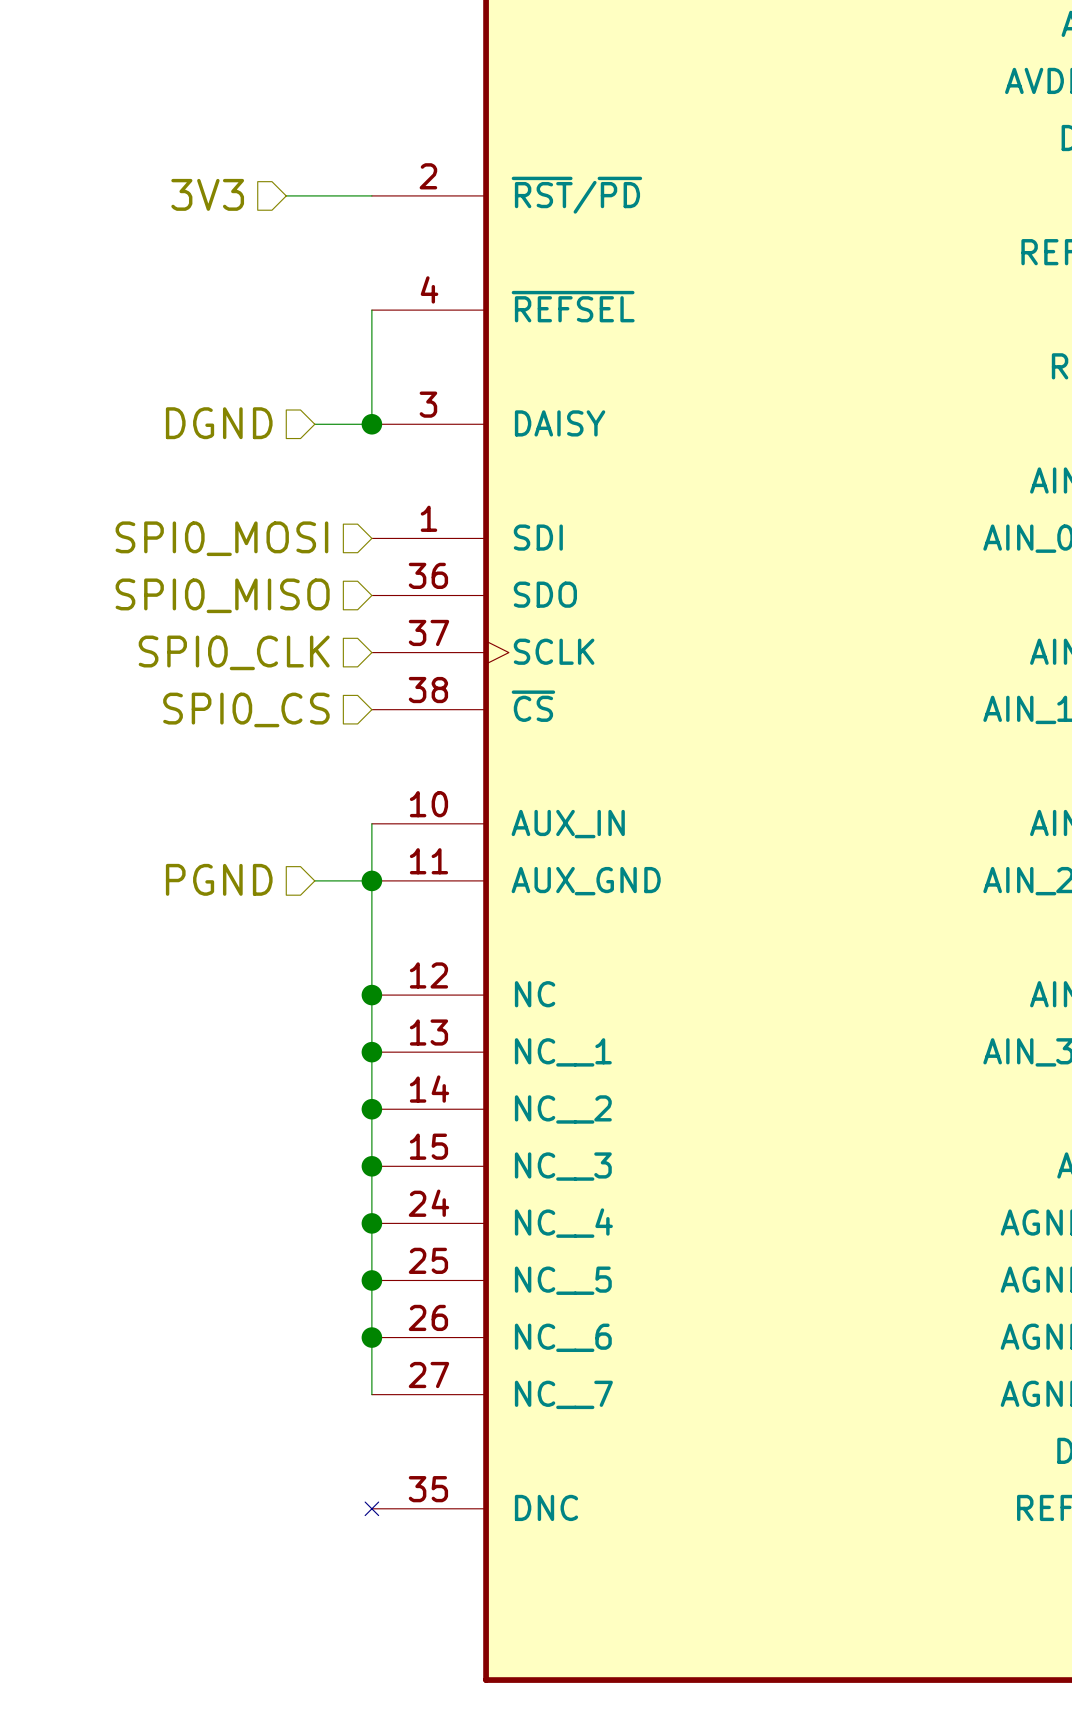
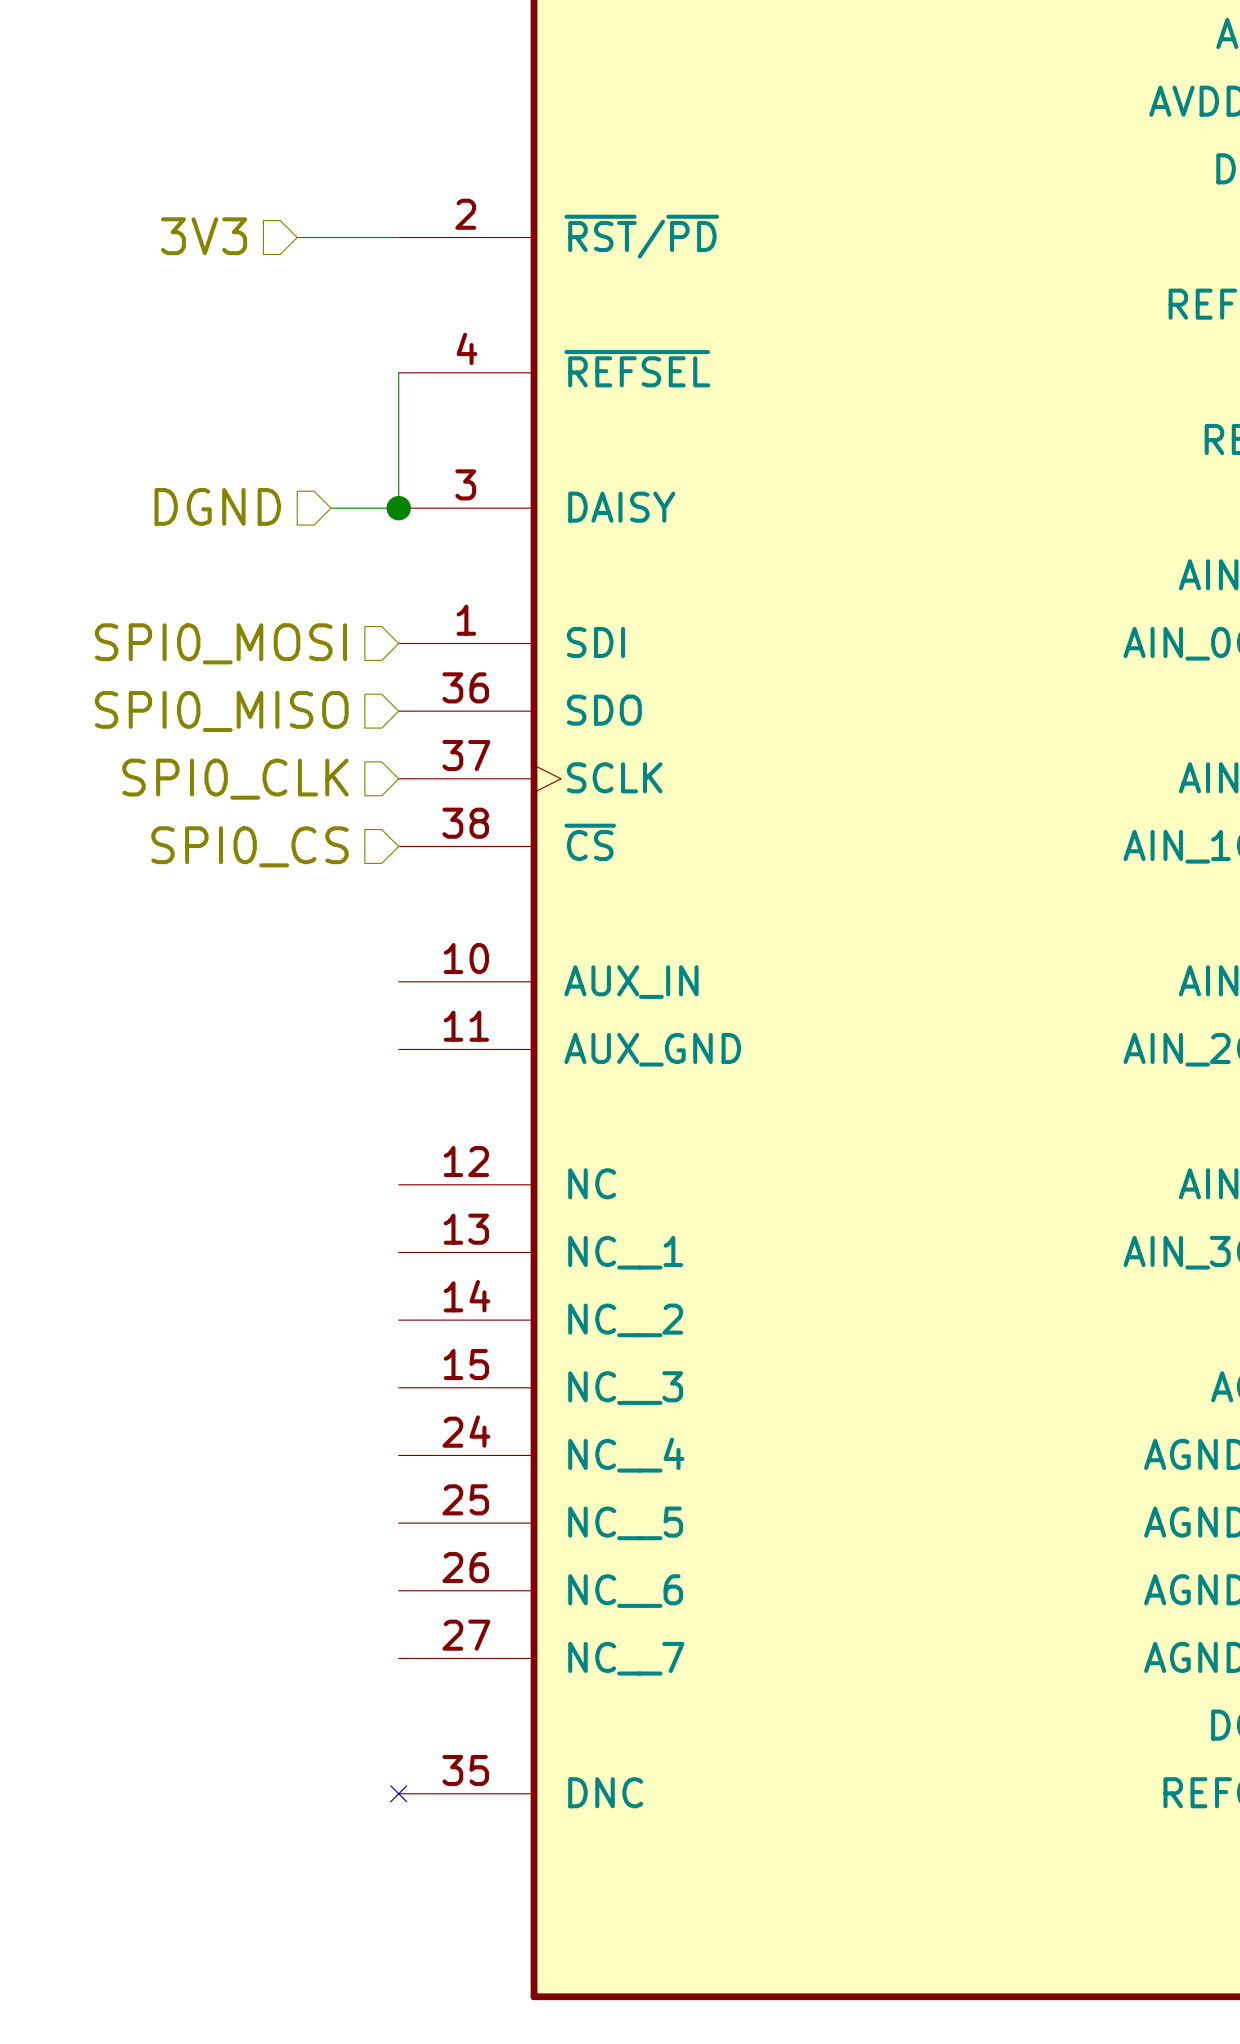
wire: (371, 823) (371, 1394) -> none
hierarchical label: PGND (219, 879) -> none
wire: (314, 880) (371, 880) -> none
junction: (371, 880) -> none
junction: (371, 995) -> none
junction: (371, 1052) -> none
junction: (371, 1109) -> none
junction: (371, 1166) -> none
junction: (371, 1223) -> none
junction: (371, 1280) -> none
junction: (371, 1337) -> none

